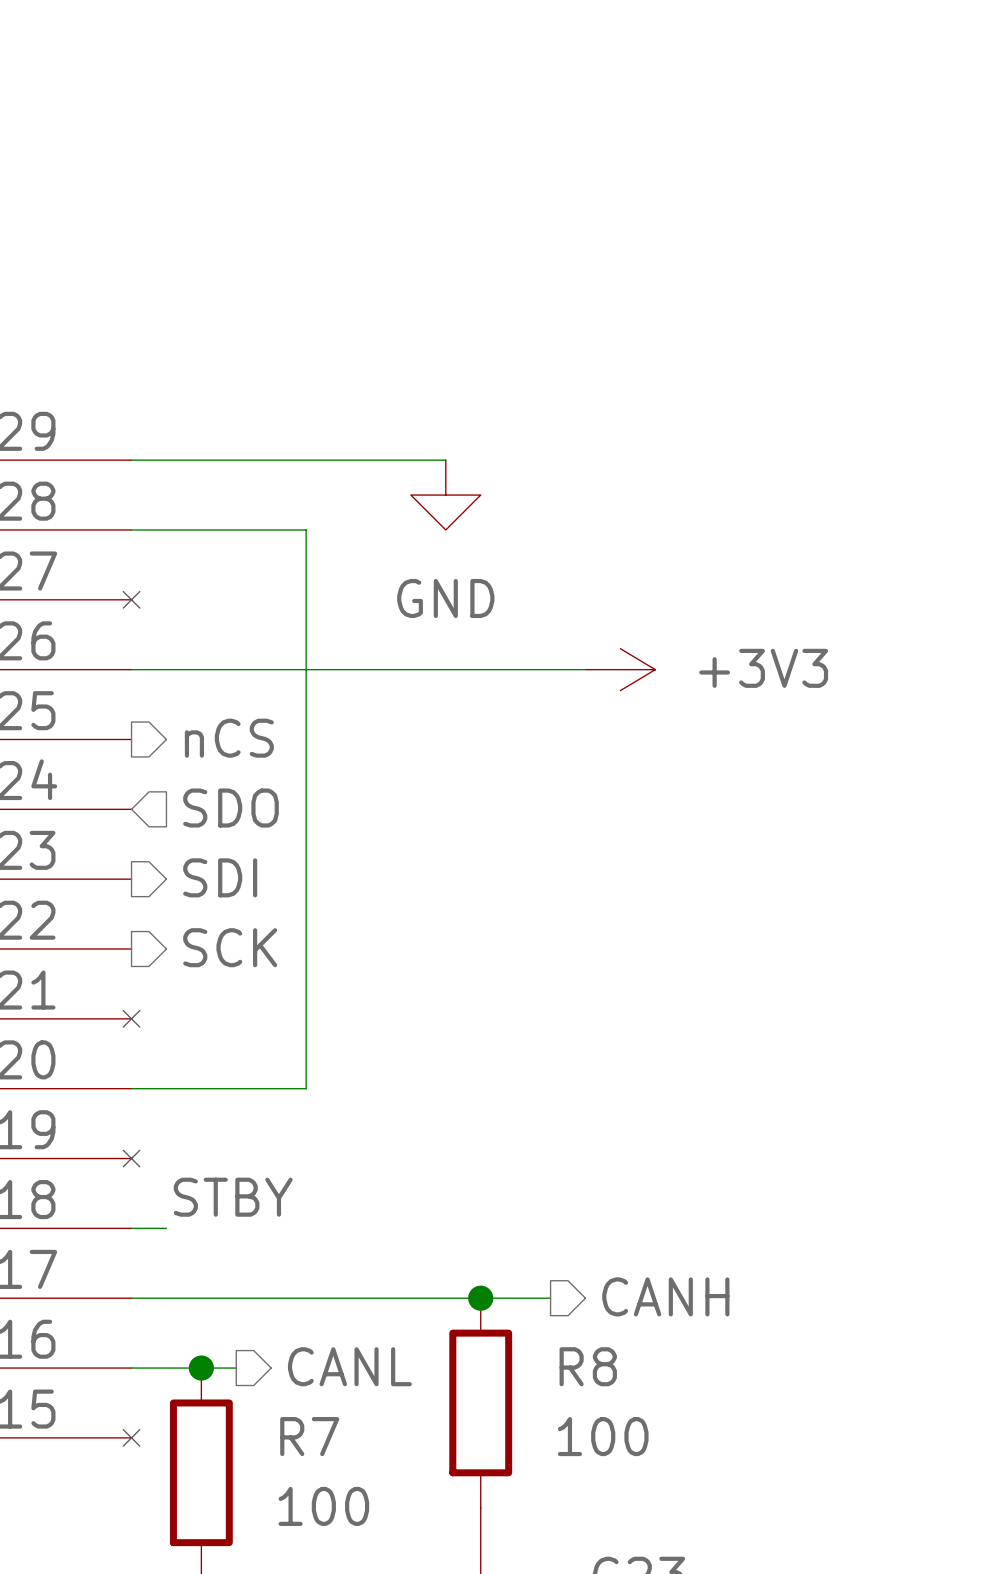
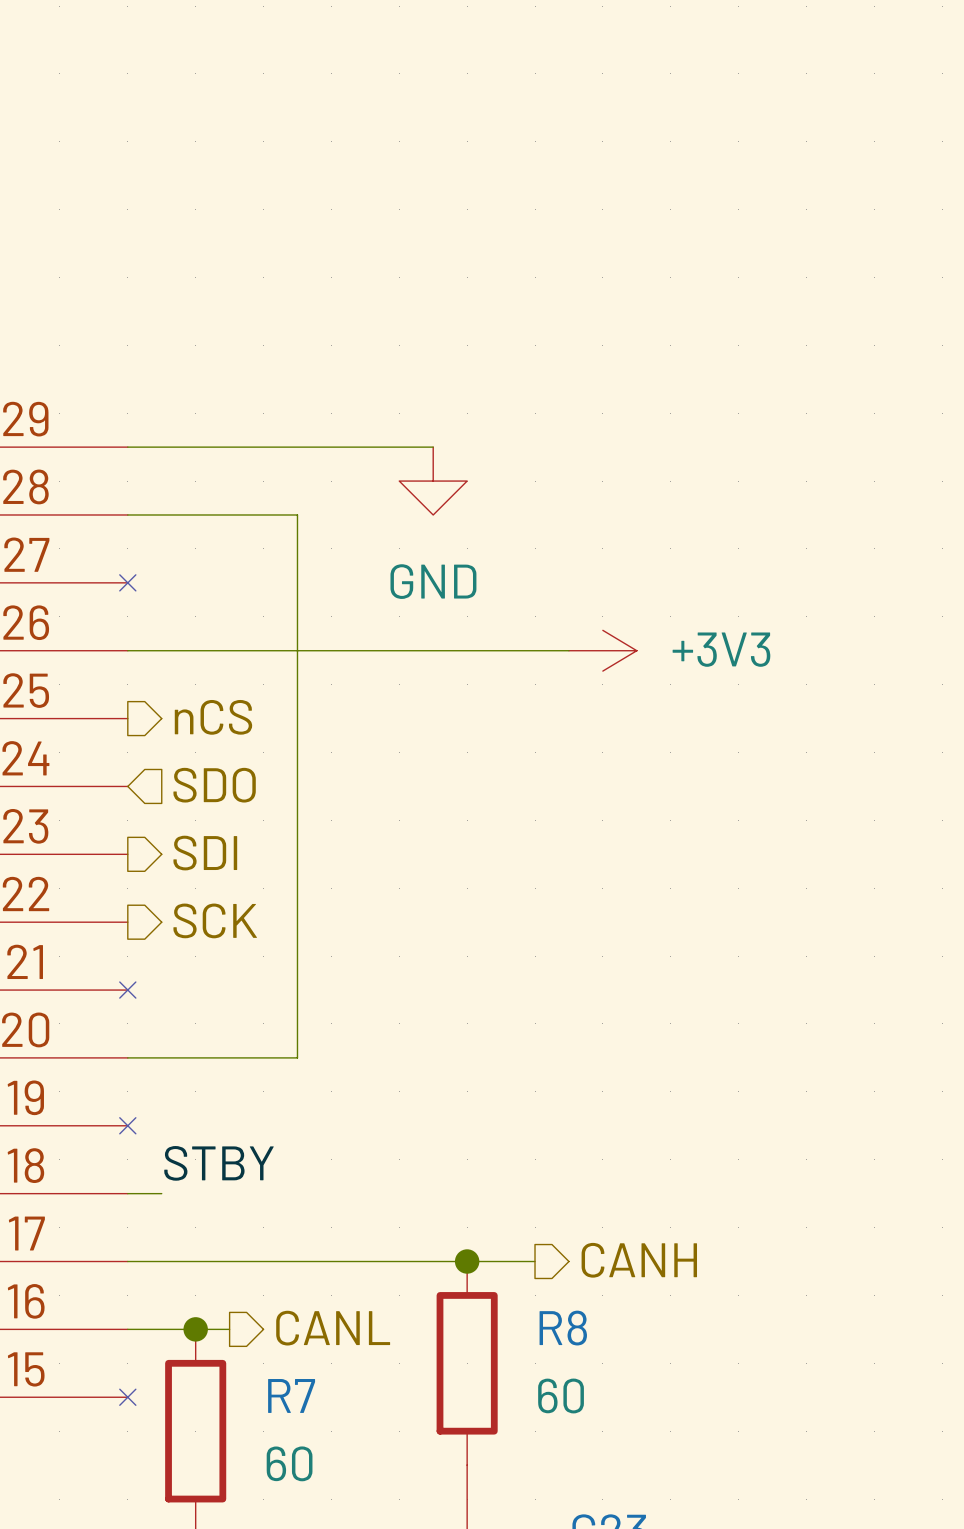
R8 value: 100 (603, 1436) -> 60 (561, 1395)
R7 value: 100 (323, 1506) -> 60 (289, 1463)

